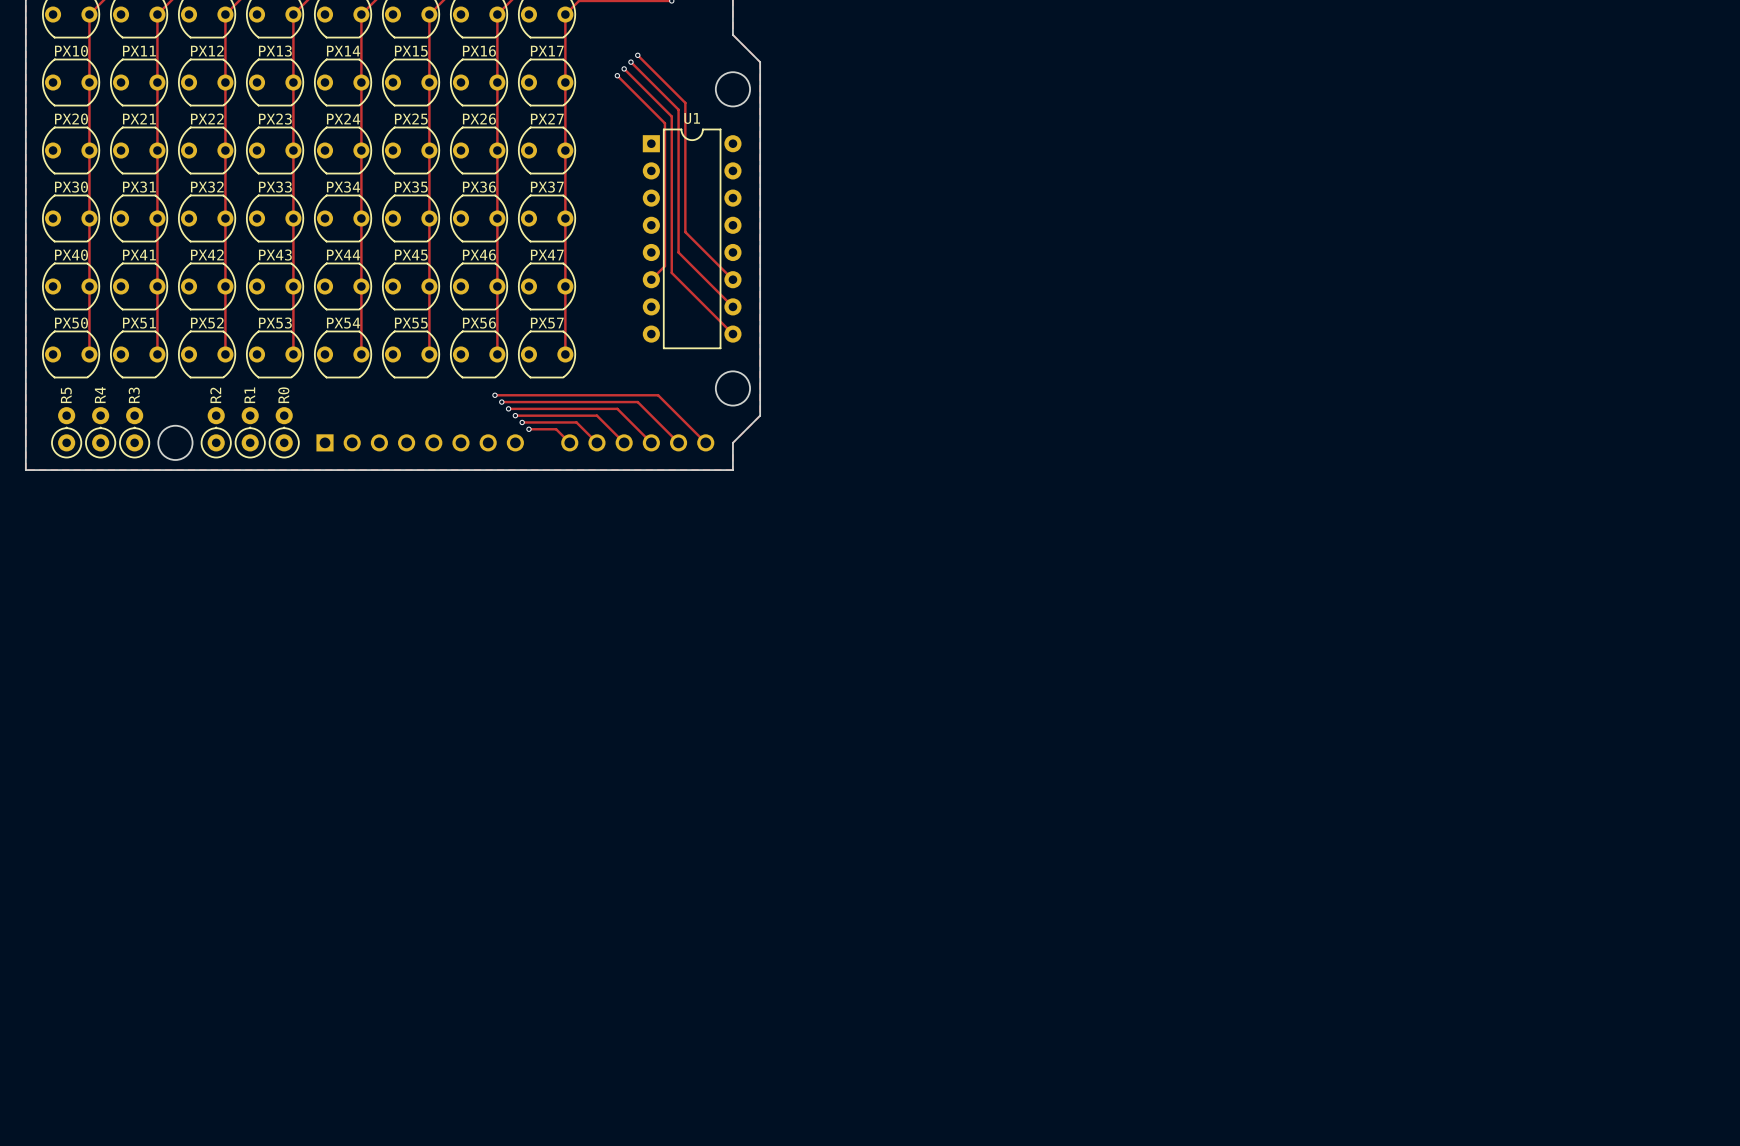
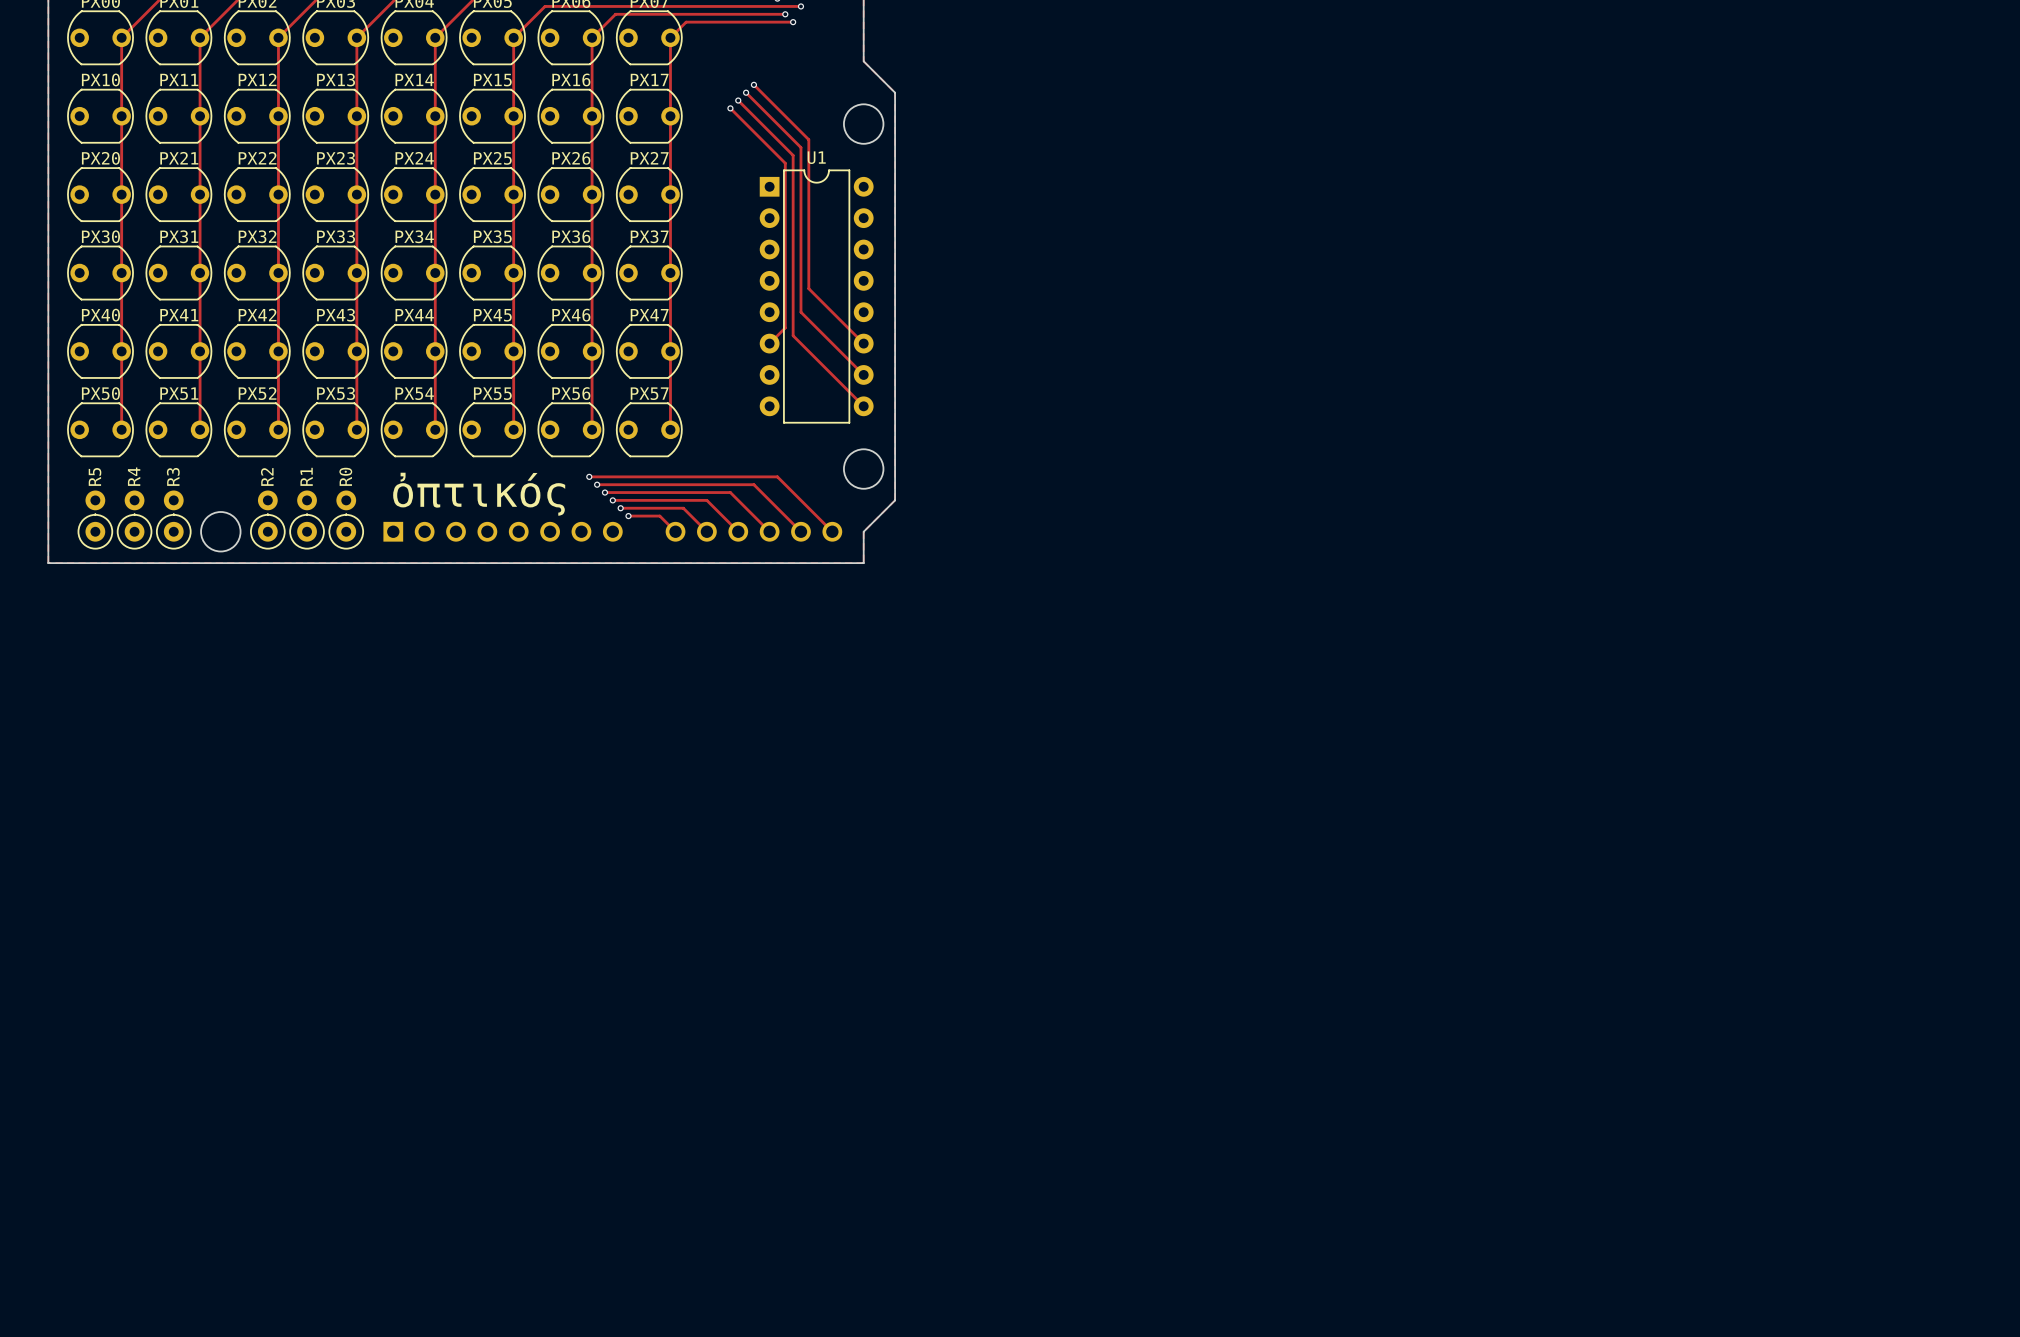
text: none -> ὀπτικός (479, 494)

